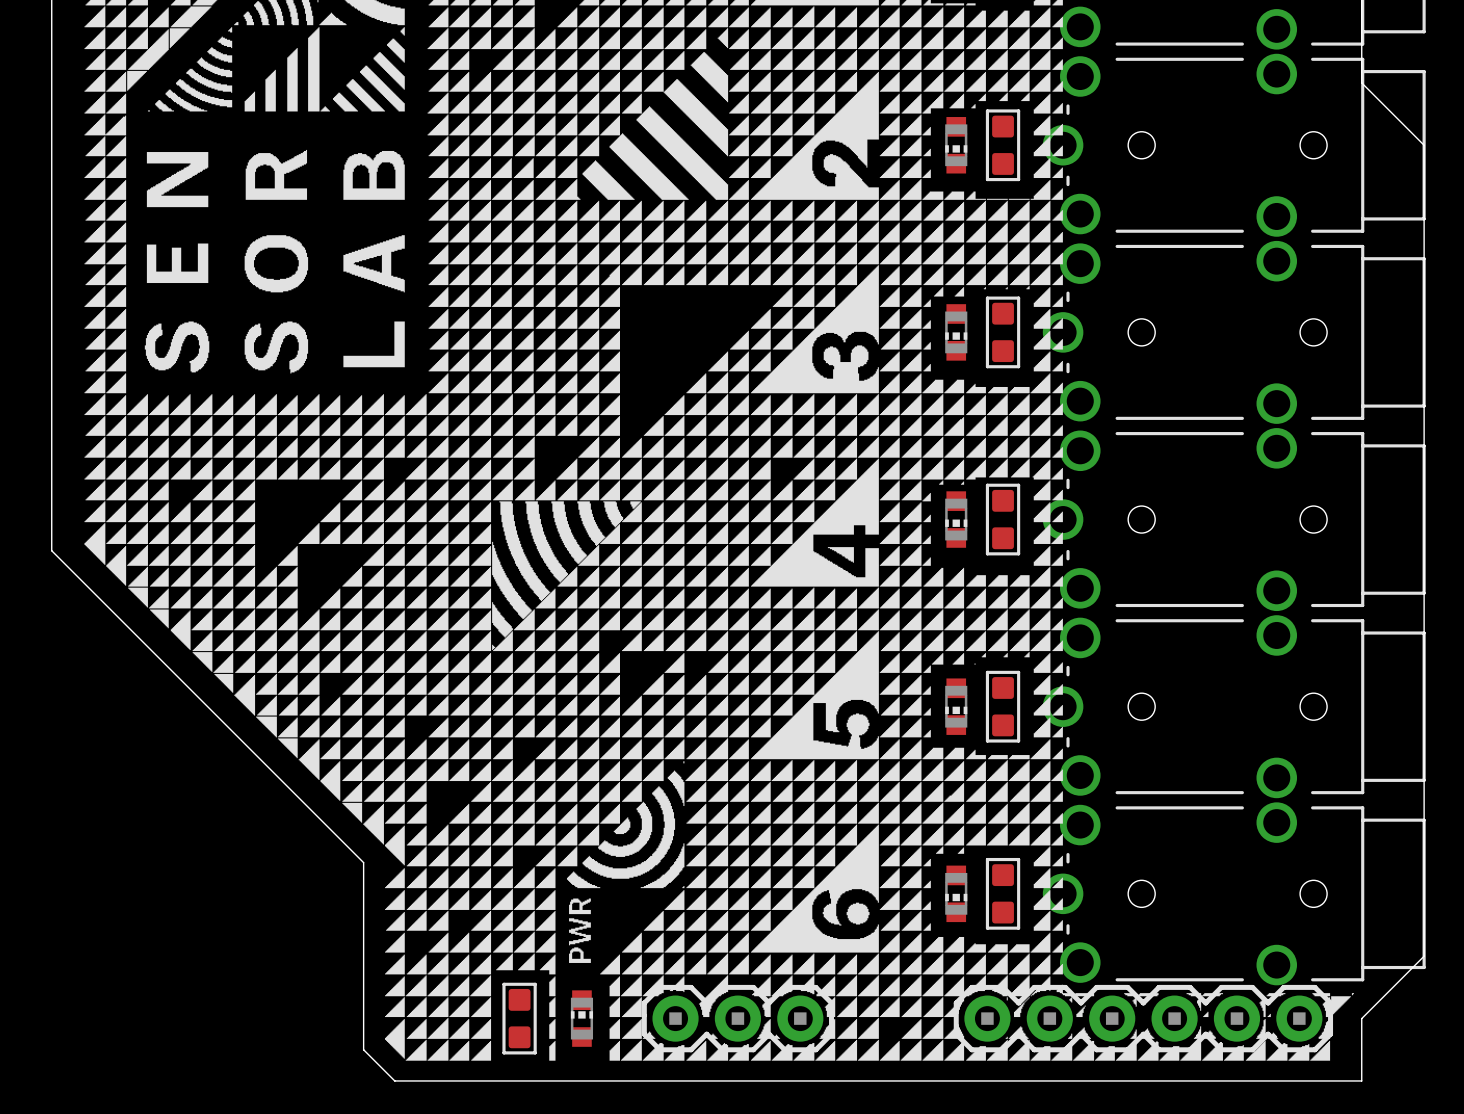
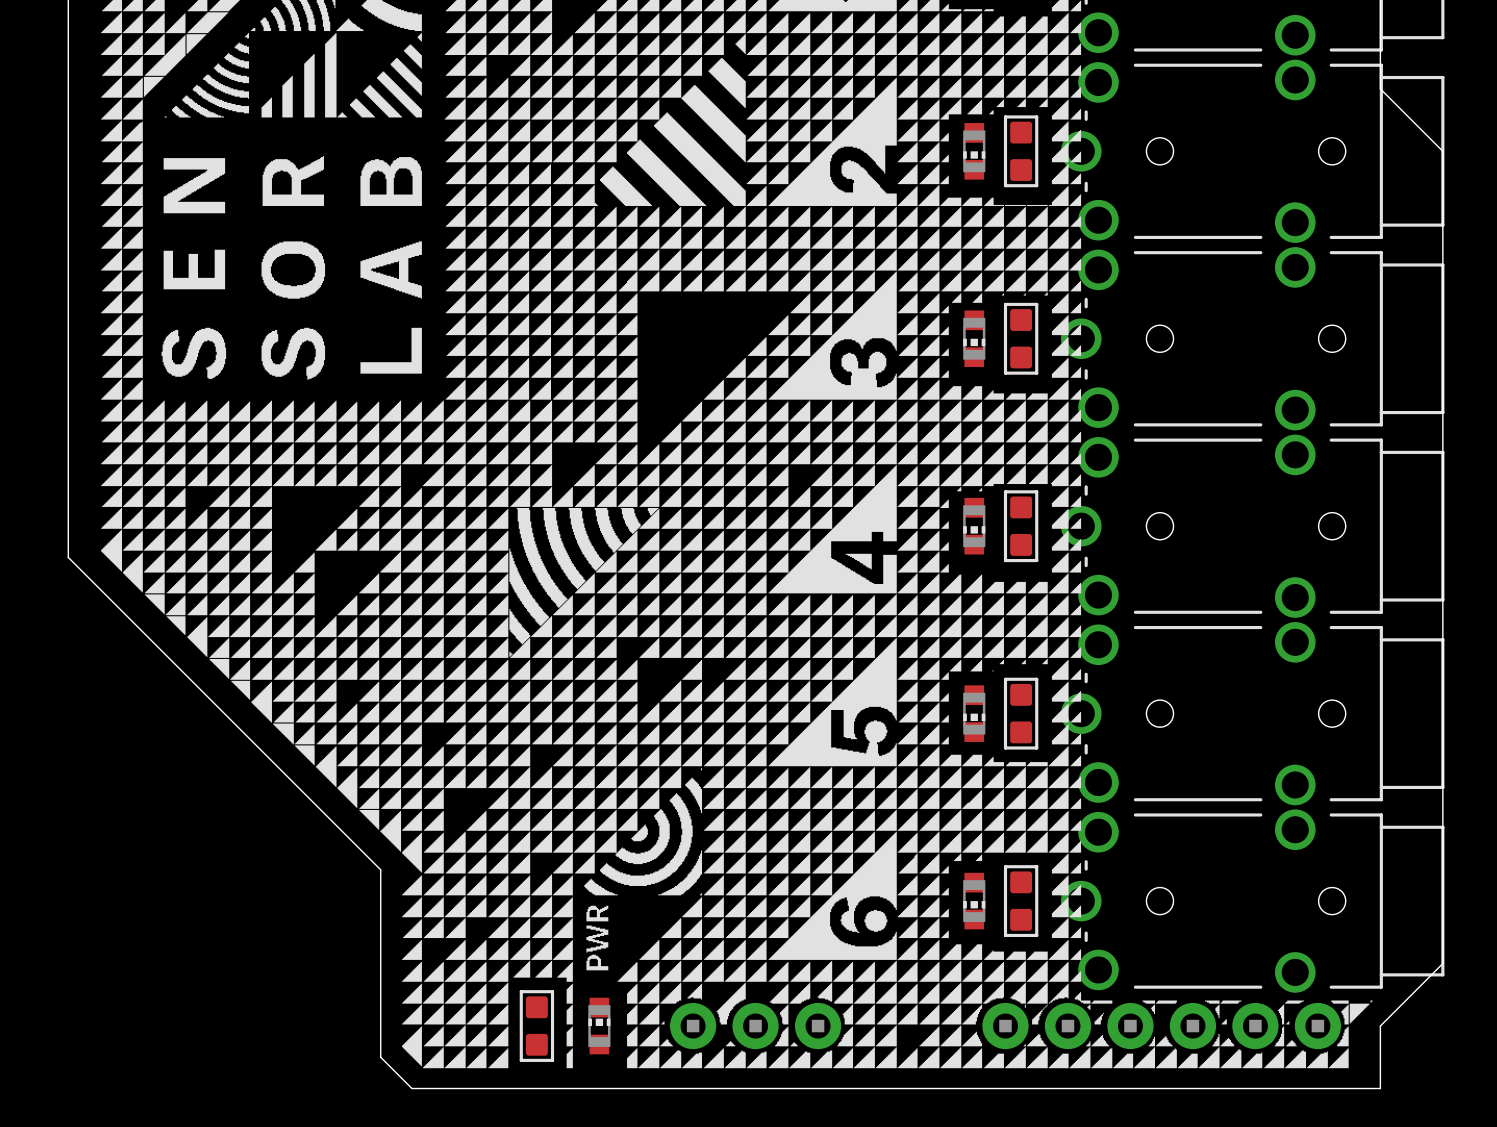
part footprint: [641, 984, 834, 1053] -> [669, 1002, 842, 1050]
part footprint: [953, 984, 1334, 1053] -> [982, 1002, 1342, 1050]

